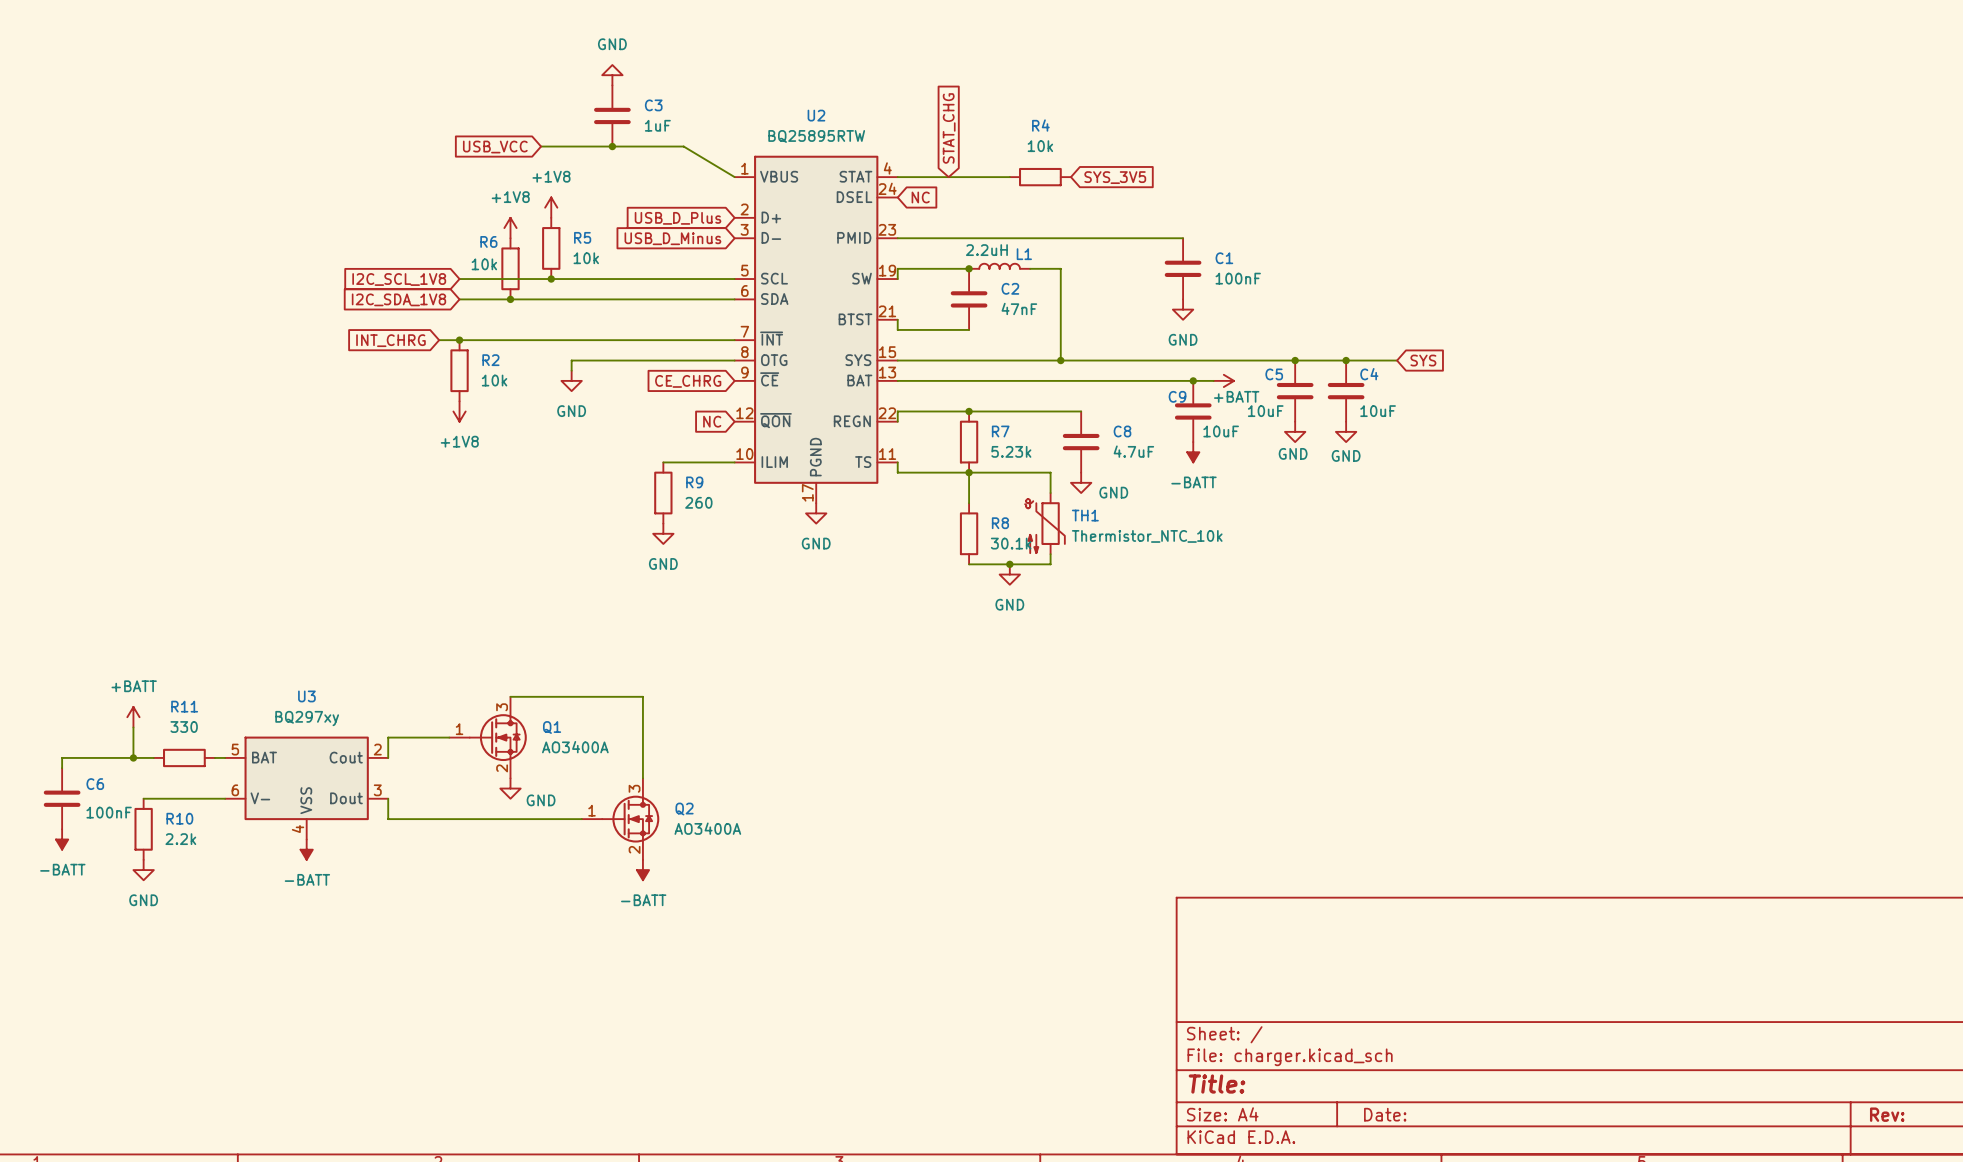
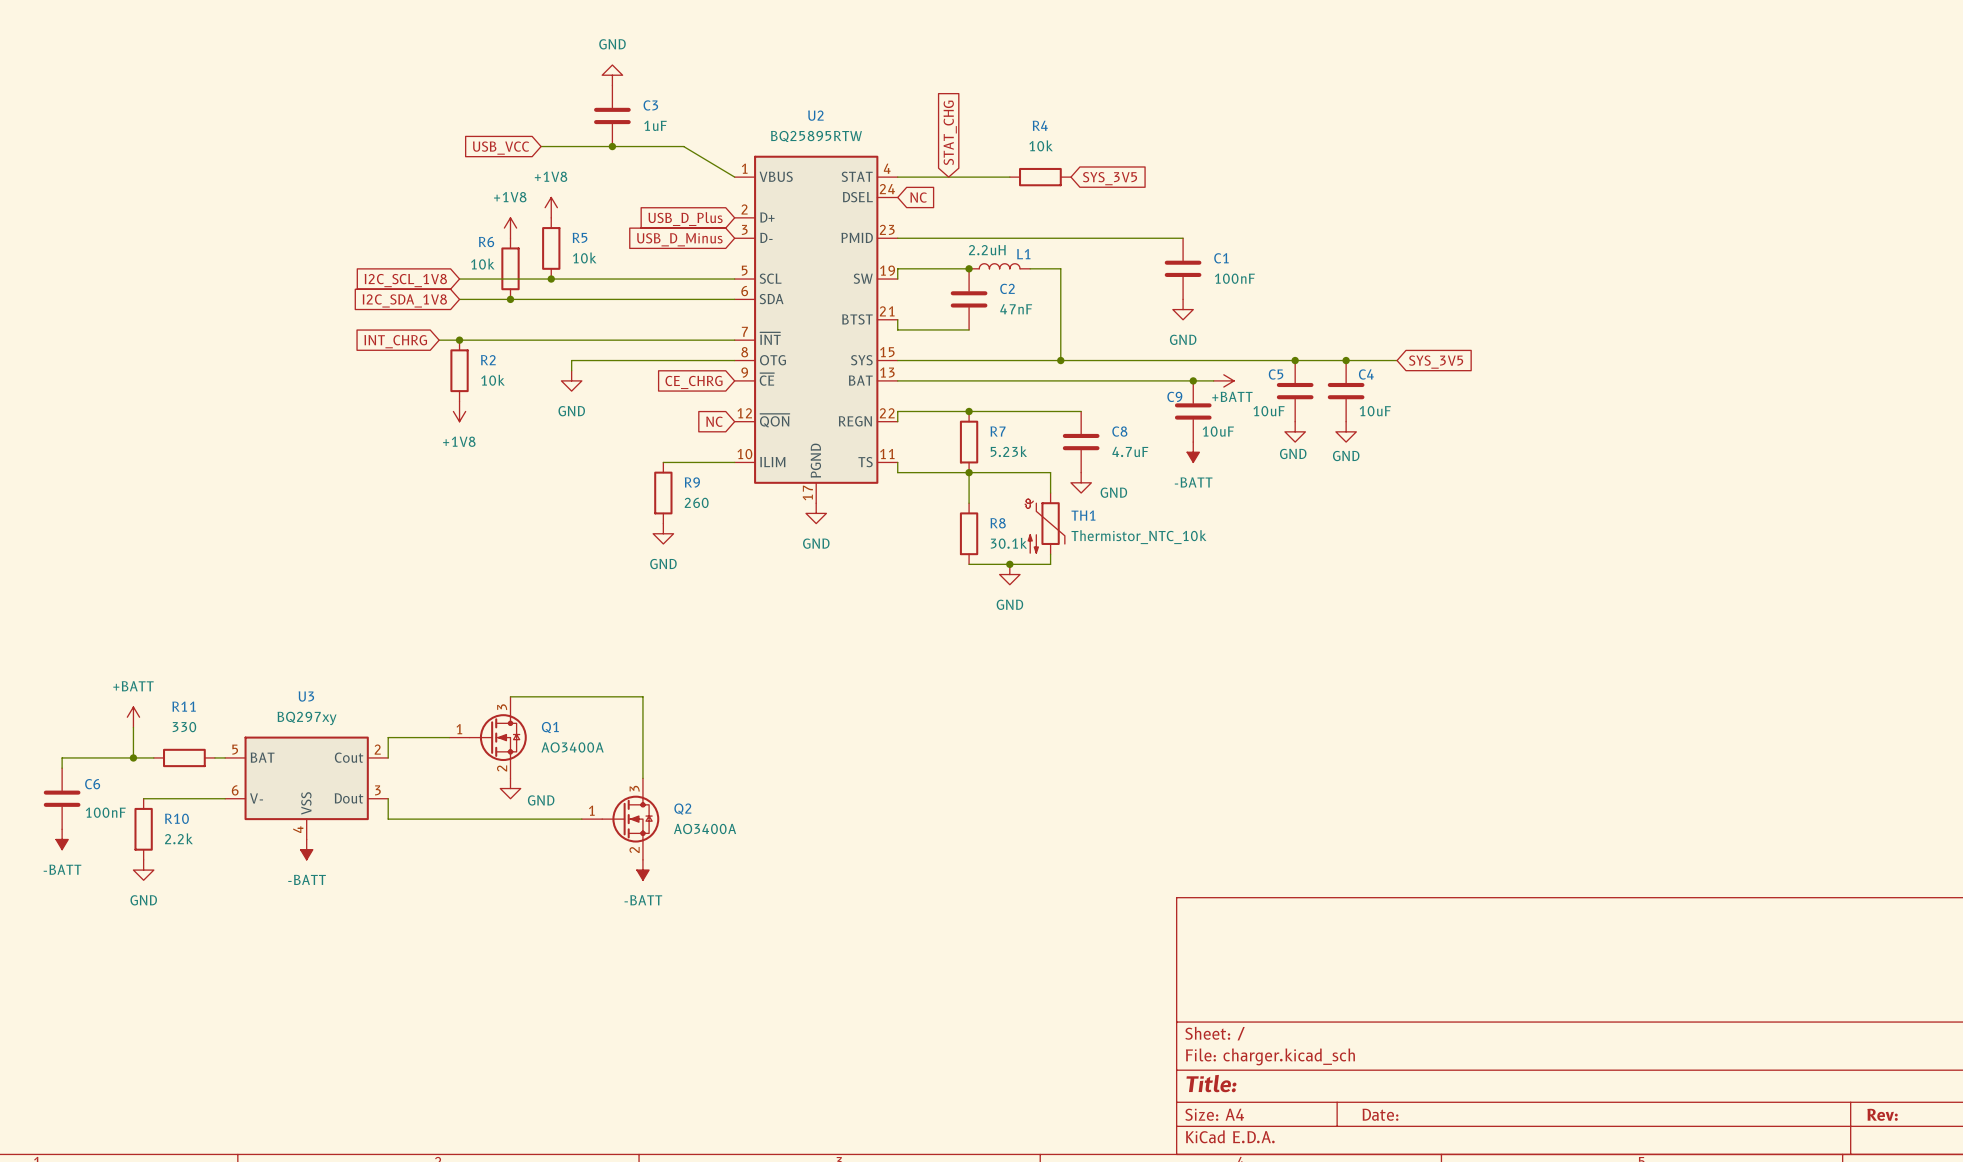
global label: SYS (1423, 360) -> SYS_3V5 (1436, 362)

